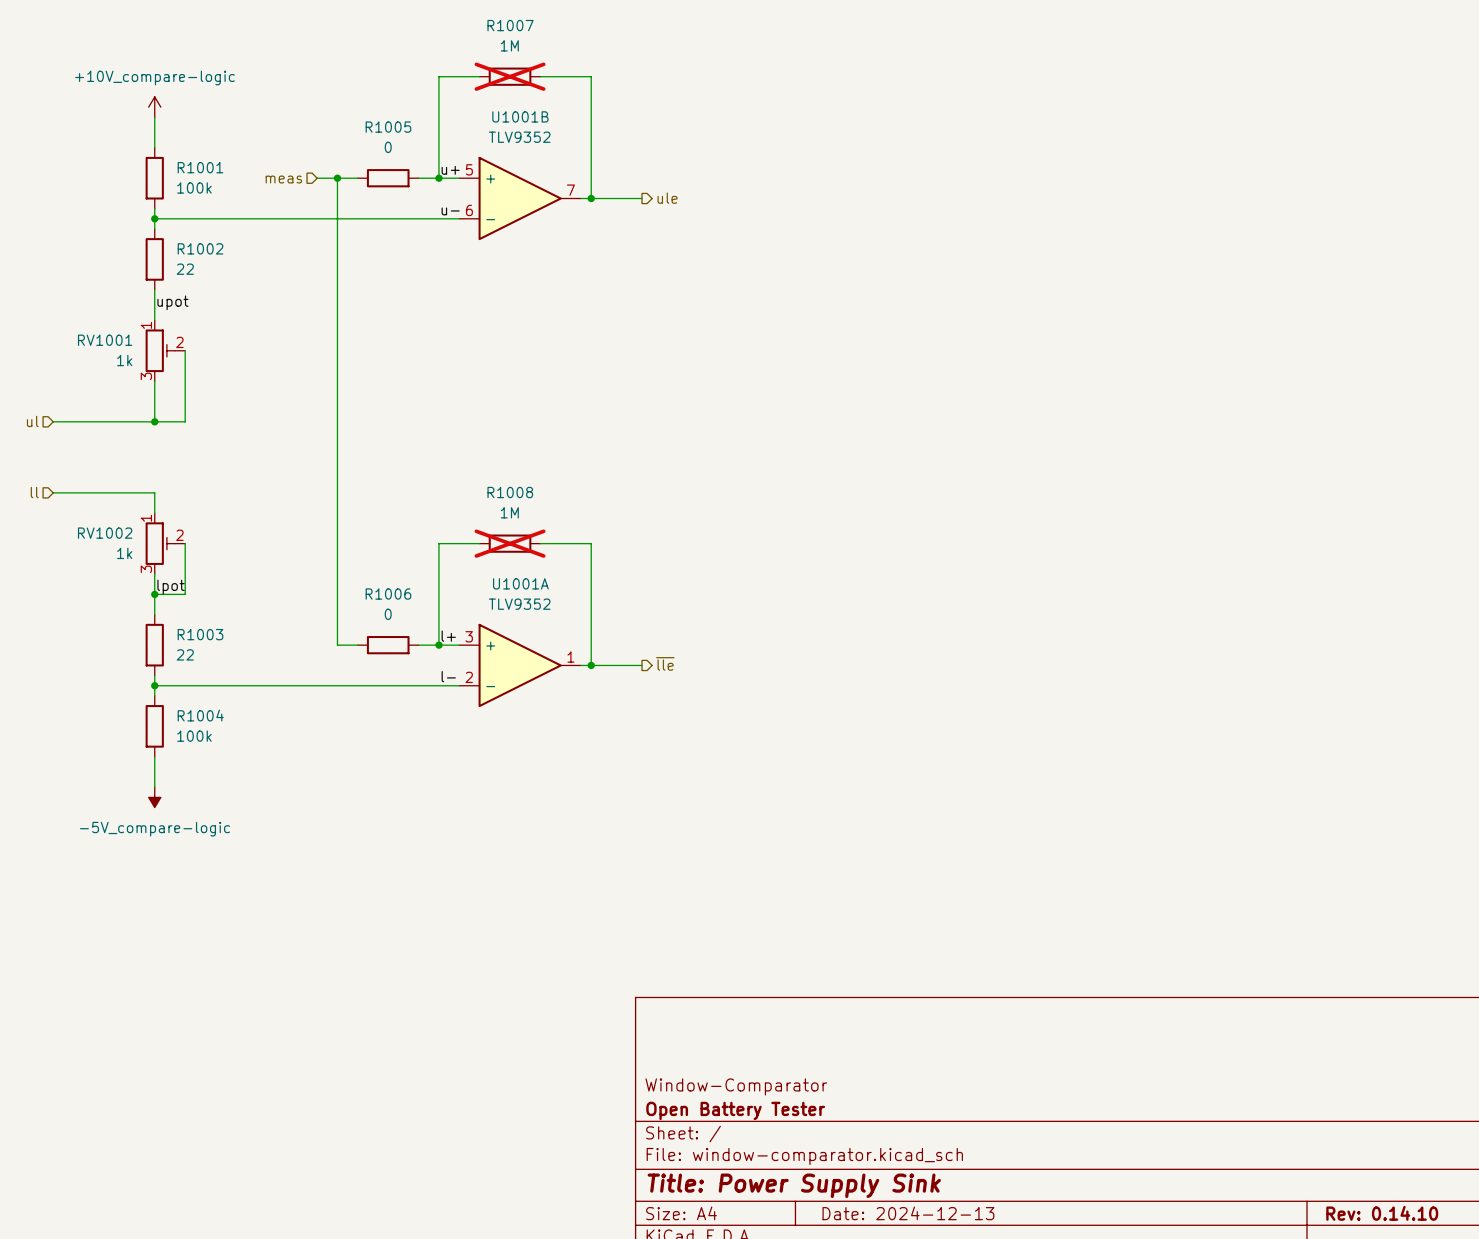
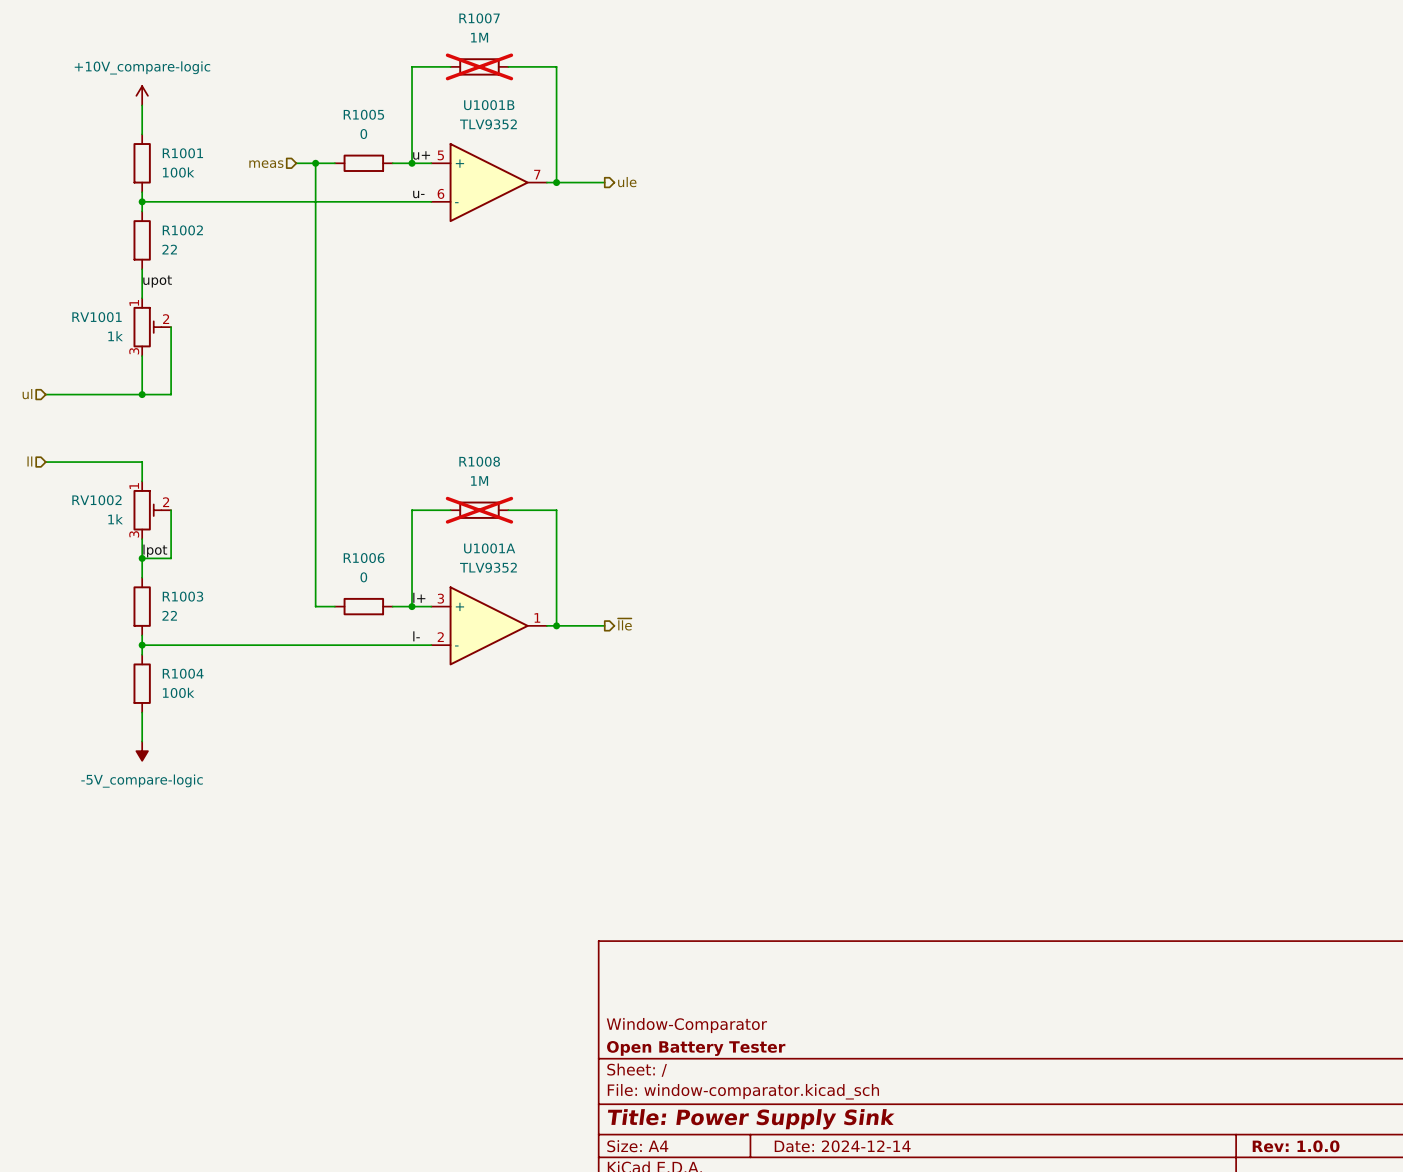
title block: Date: 2024-12-13 (908, 1213) -> Date: 2024-12-14 (842, 1146)
title block: Rev: 0.14.10 (1382, 1213) -> Rev: 1.0.0 (1296, 1146)

